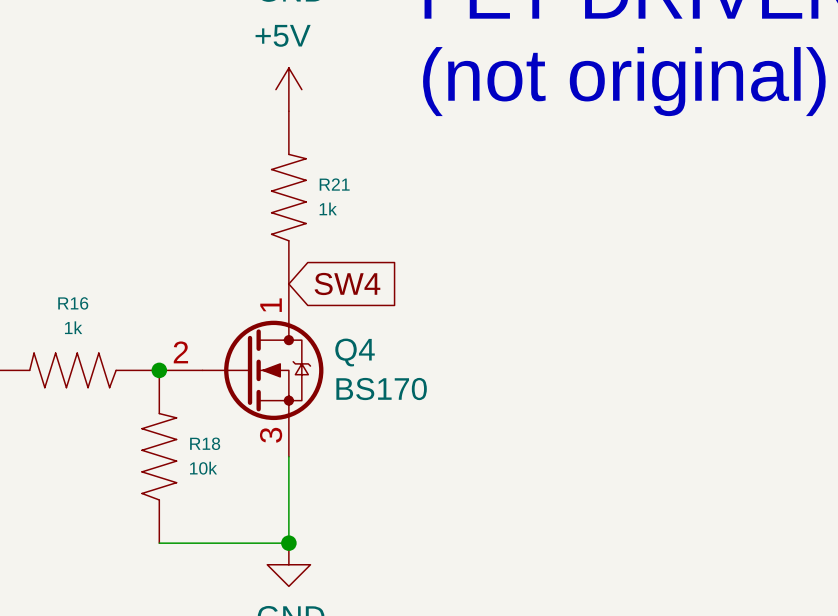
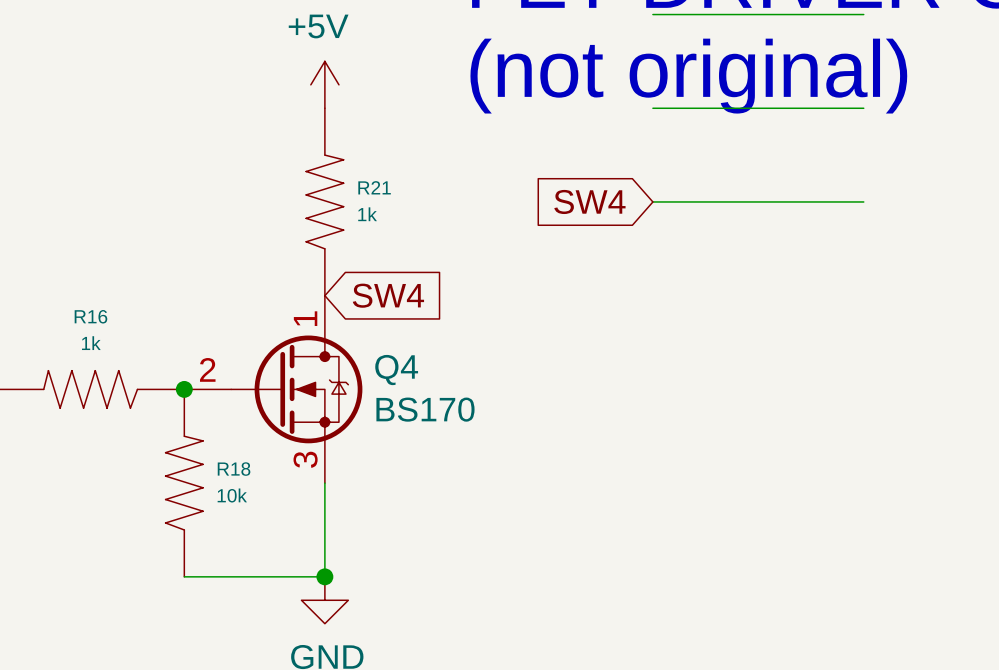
wire: none -> (652, 14) (863, 14)
wire: none -> (652, 108) (863, 108)
global label: none -> SW4 (589, 201)
wire: none -> (652, 201) (863, 201)

